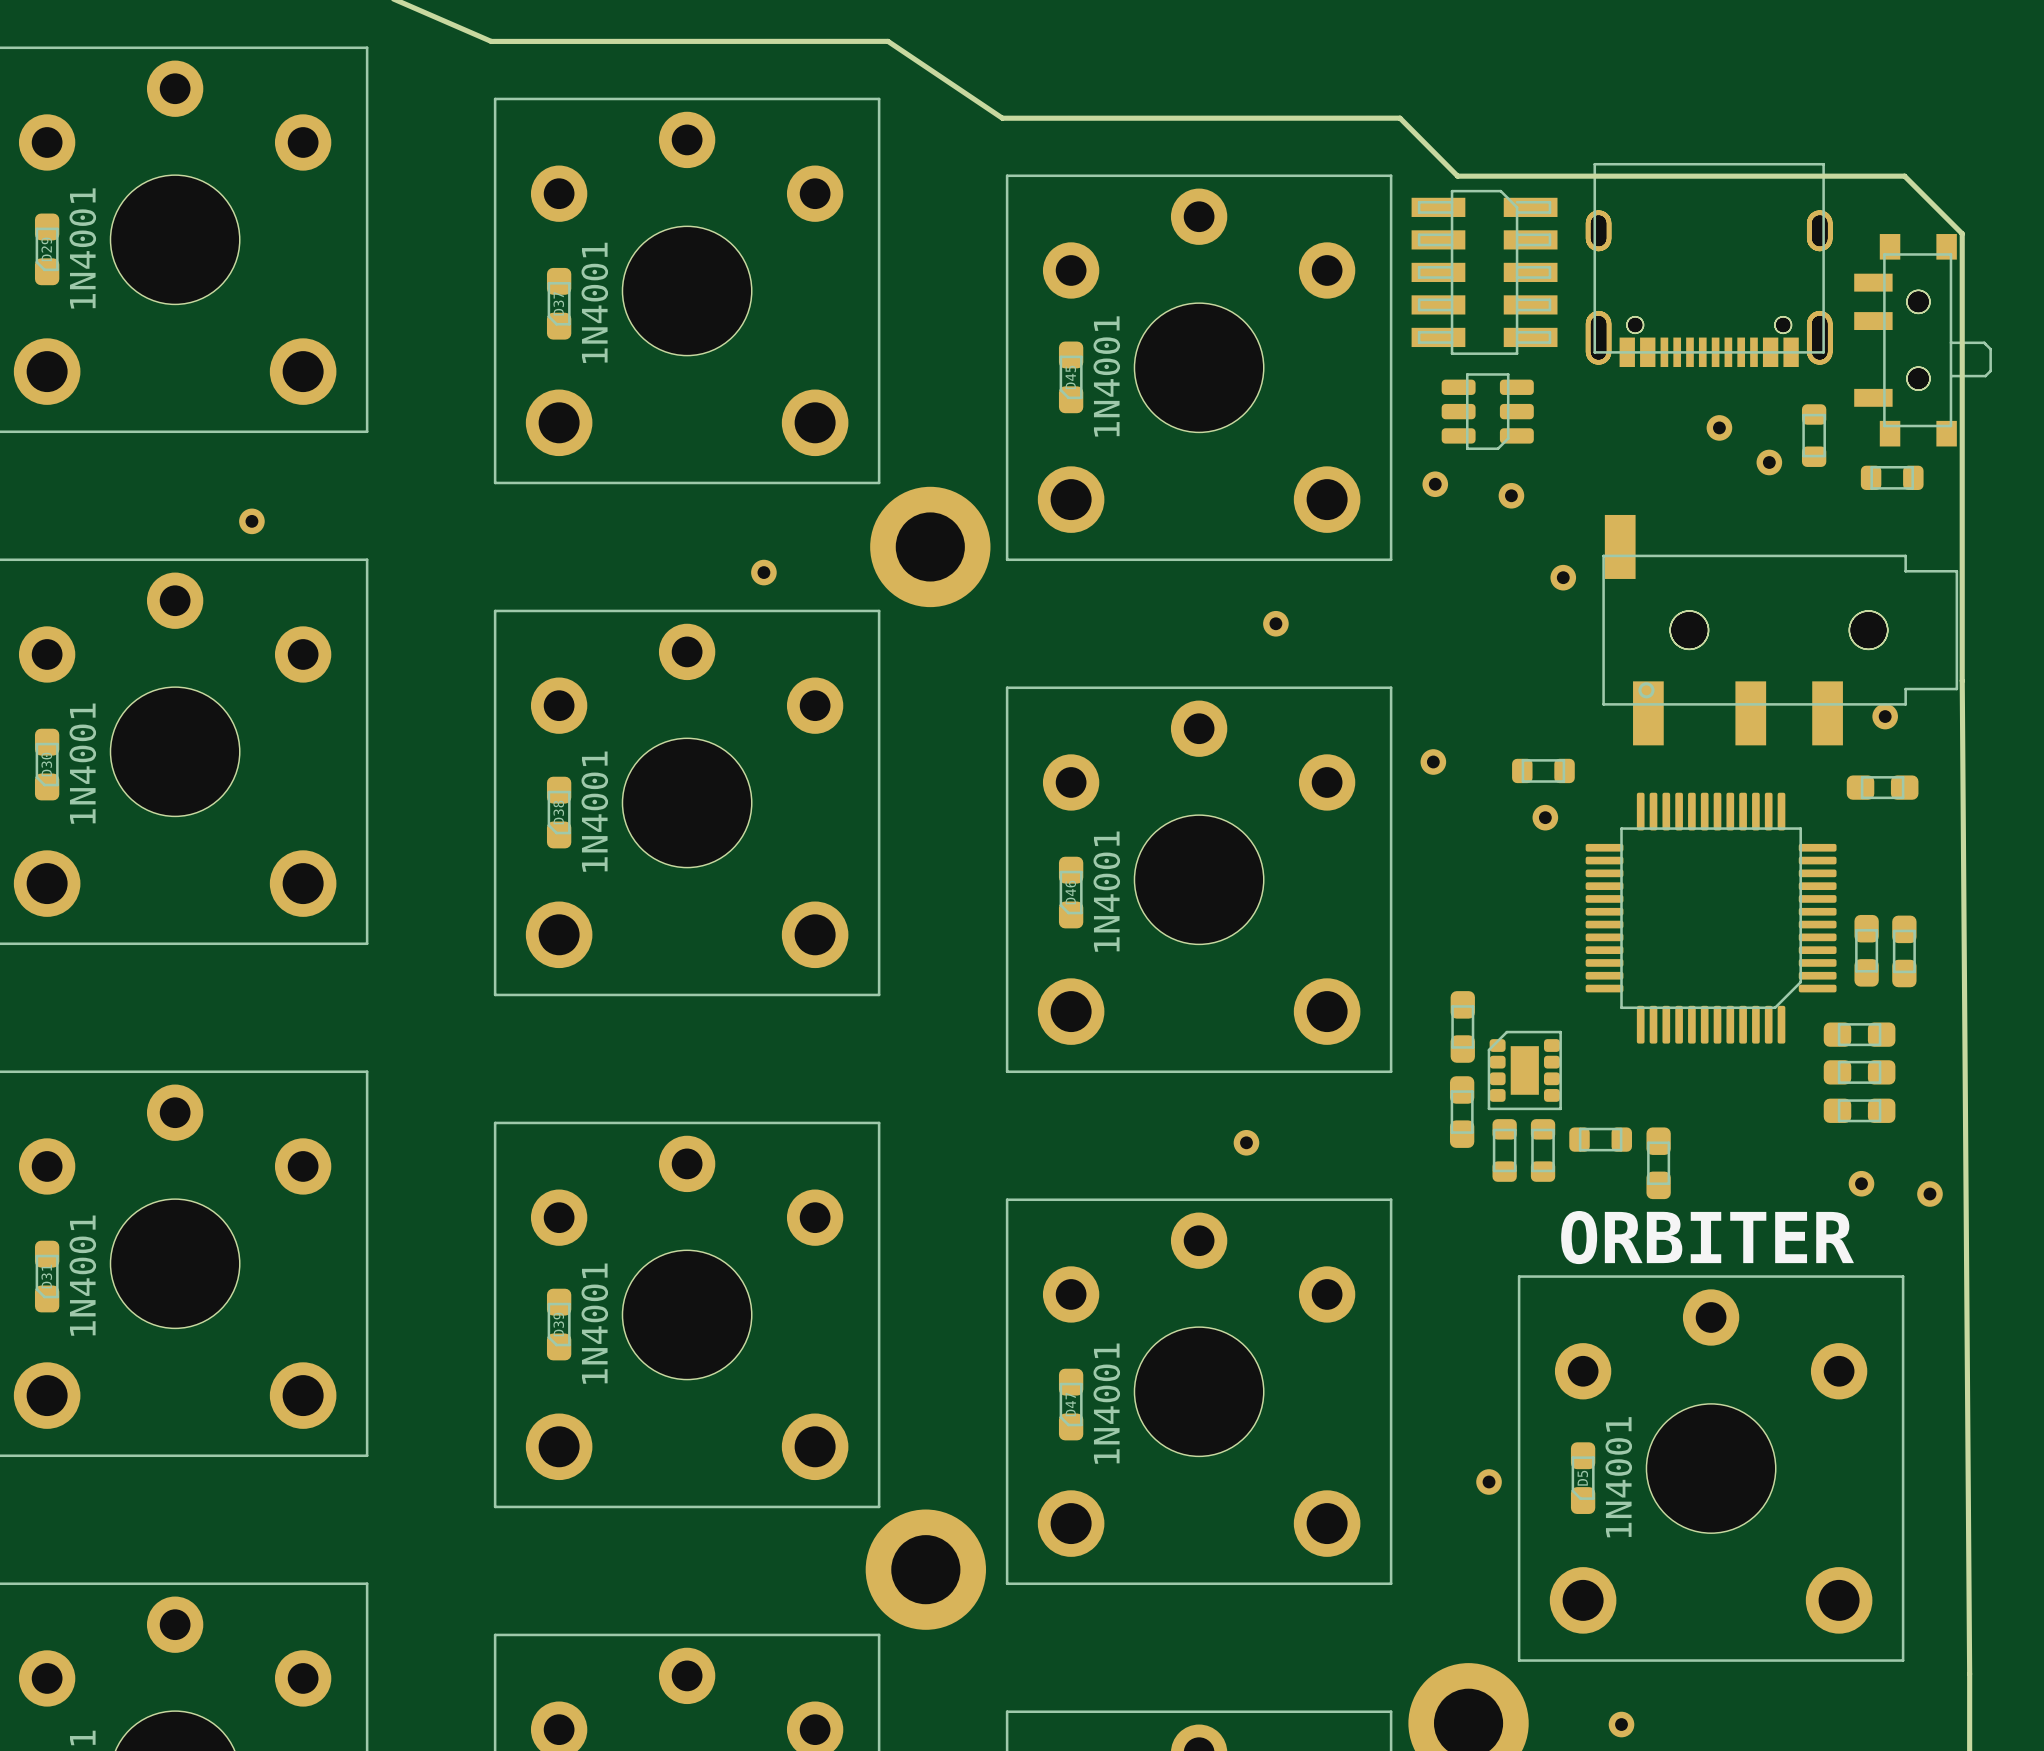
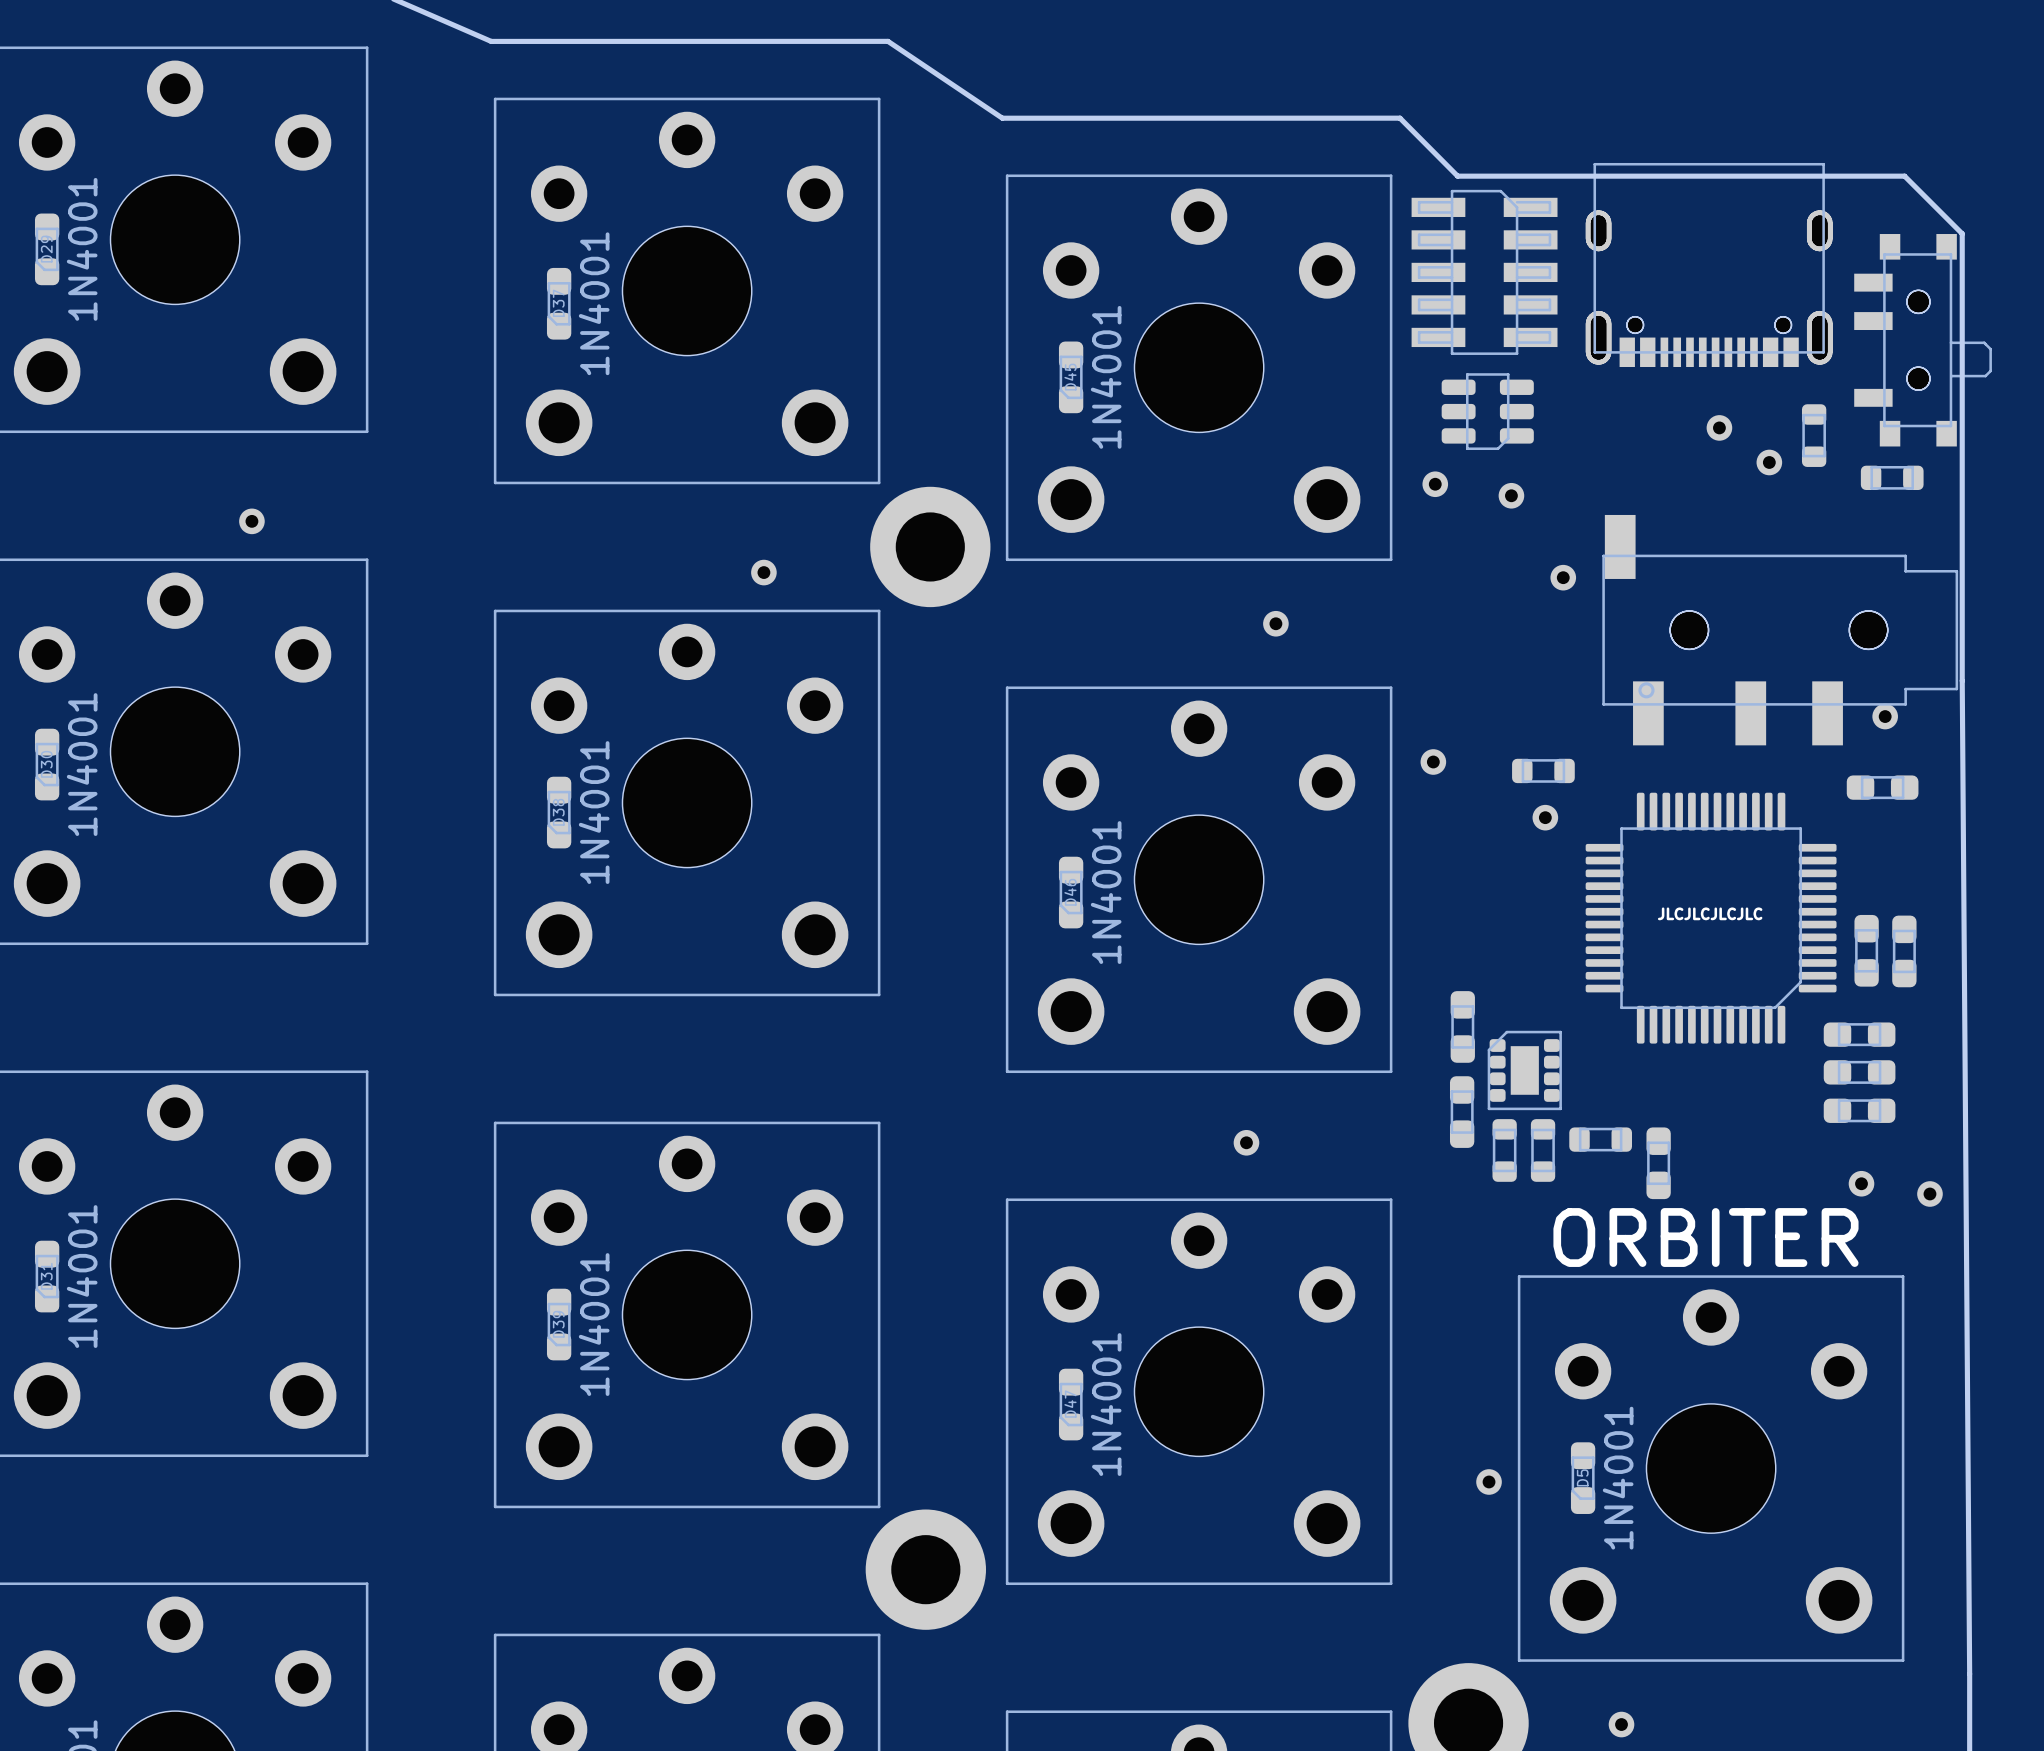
text: none -> JLCJLCJLCJLC (1710, 913)

